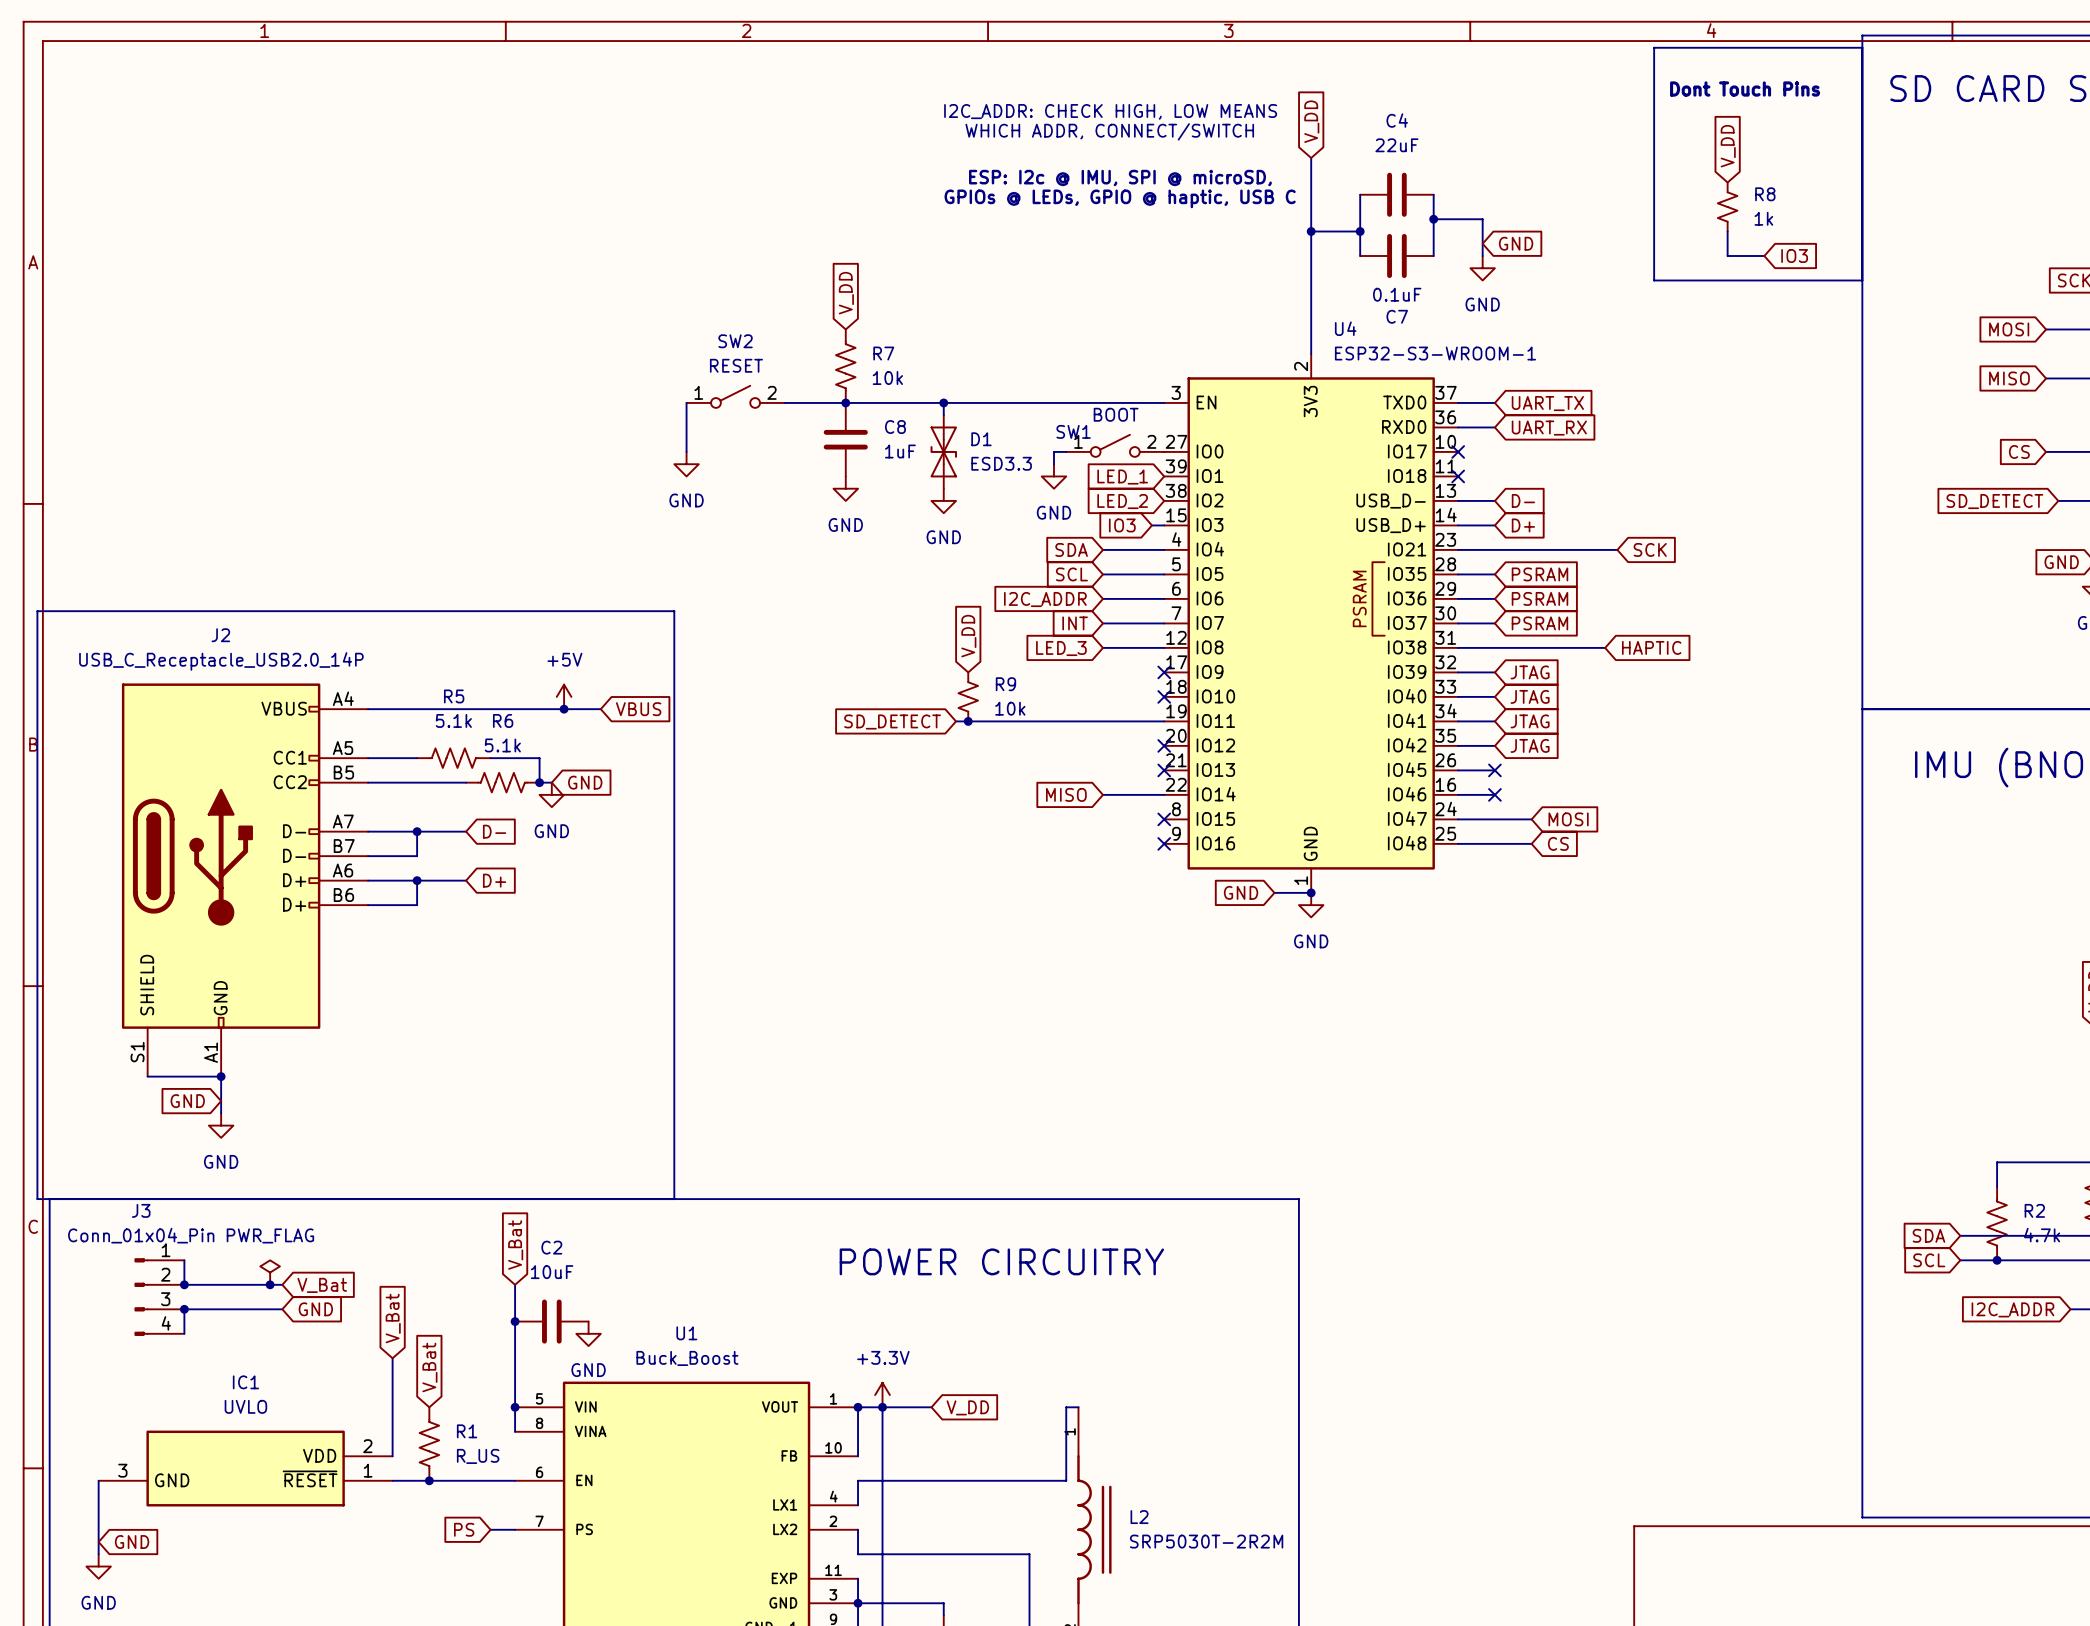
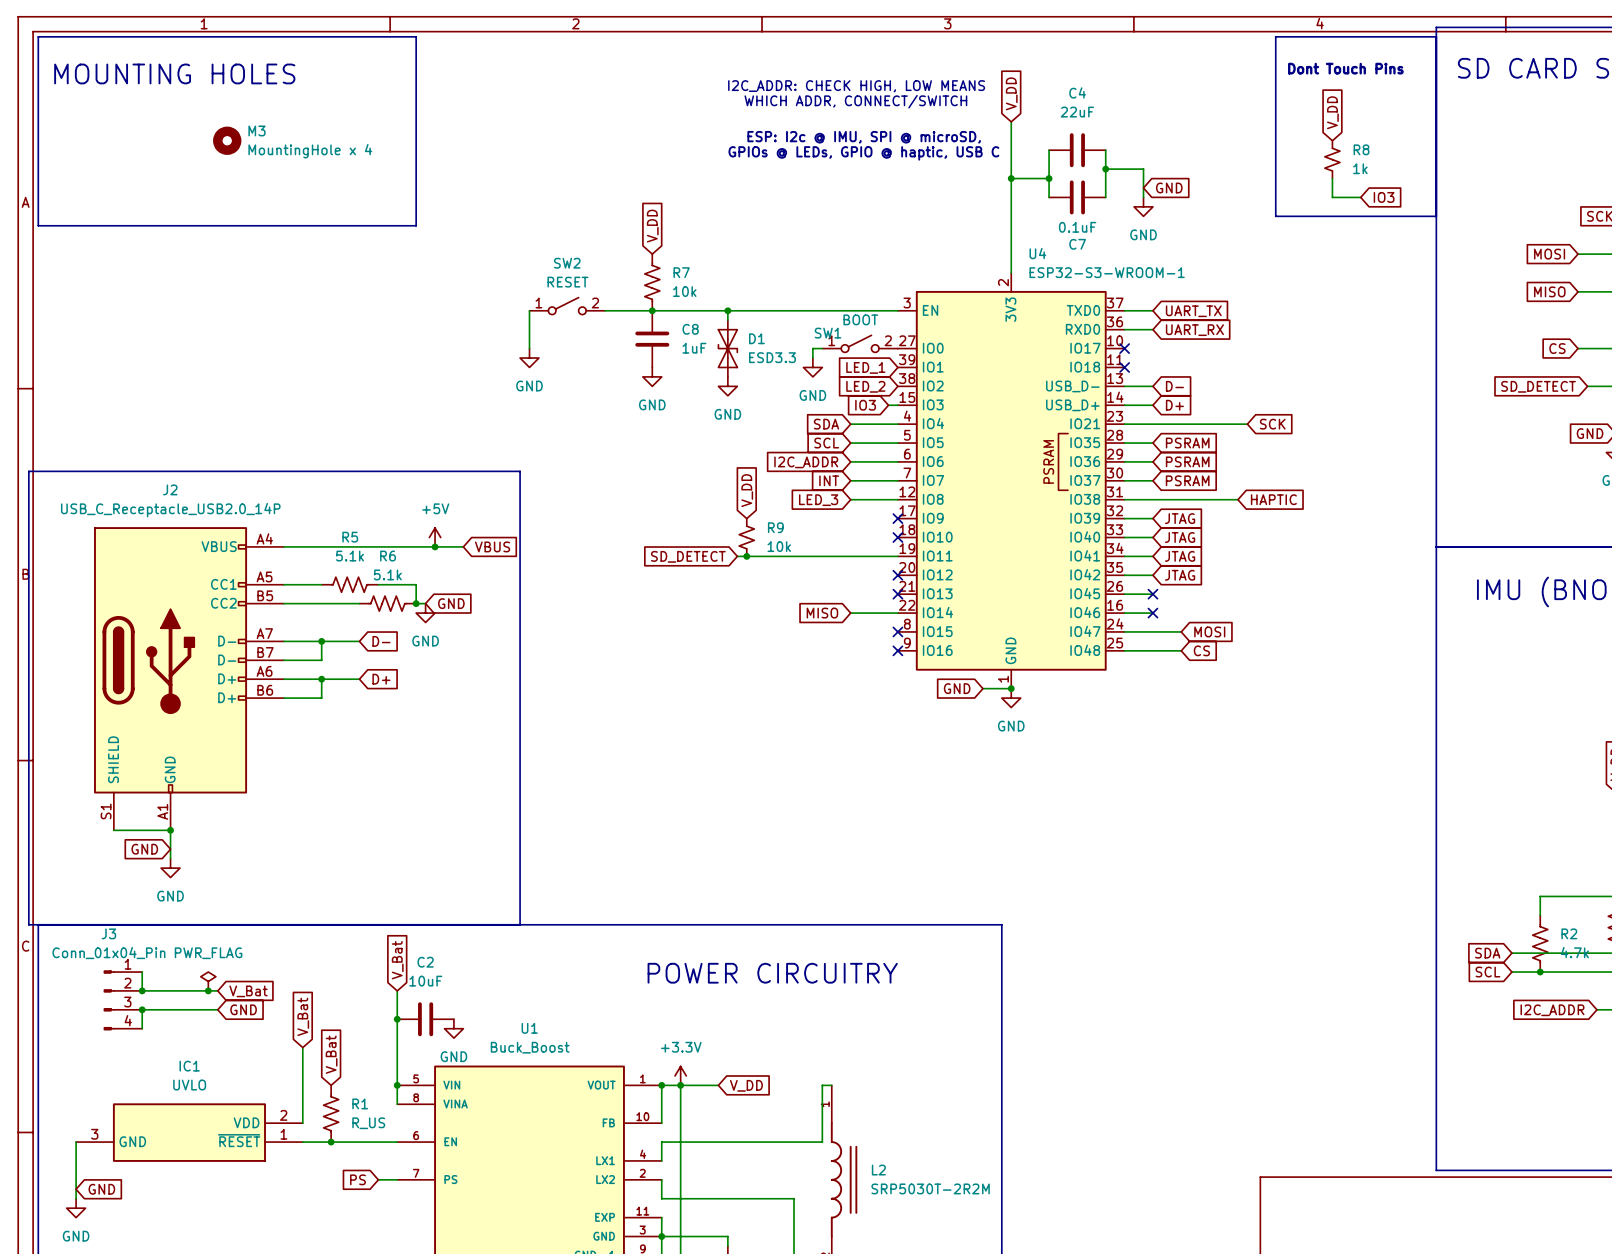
line: none -> (38, 36) (416, 36) (416, 225) (38, 225) (38, 36)
text: none -> MOUNTING HOLES (174, 73)
M3: none -> MountingHole x 4 (227, 140)

